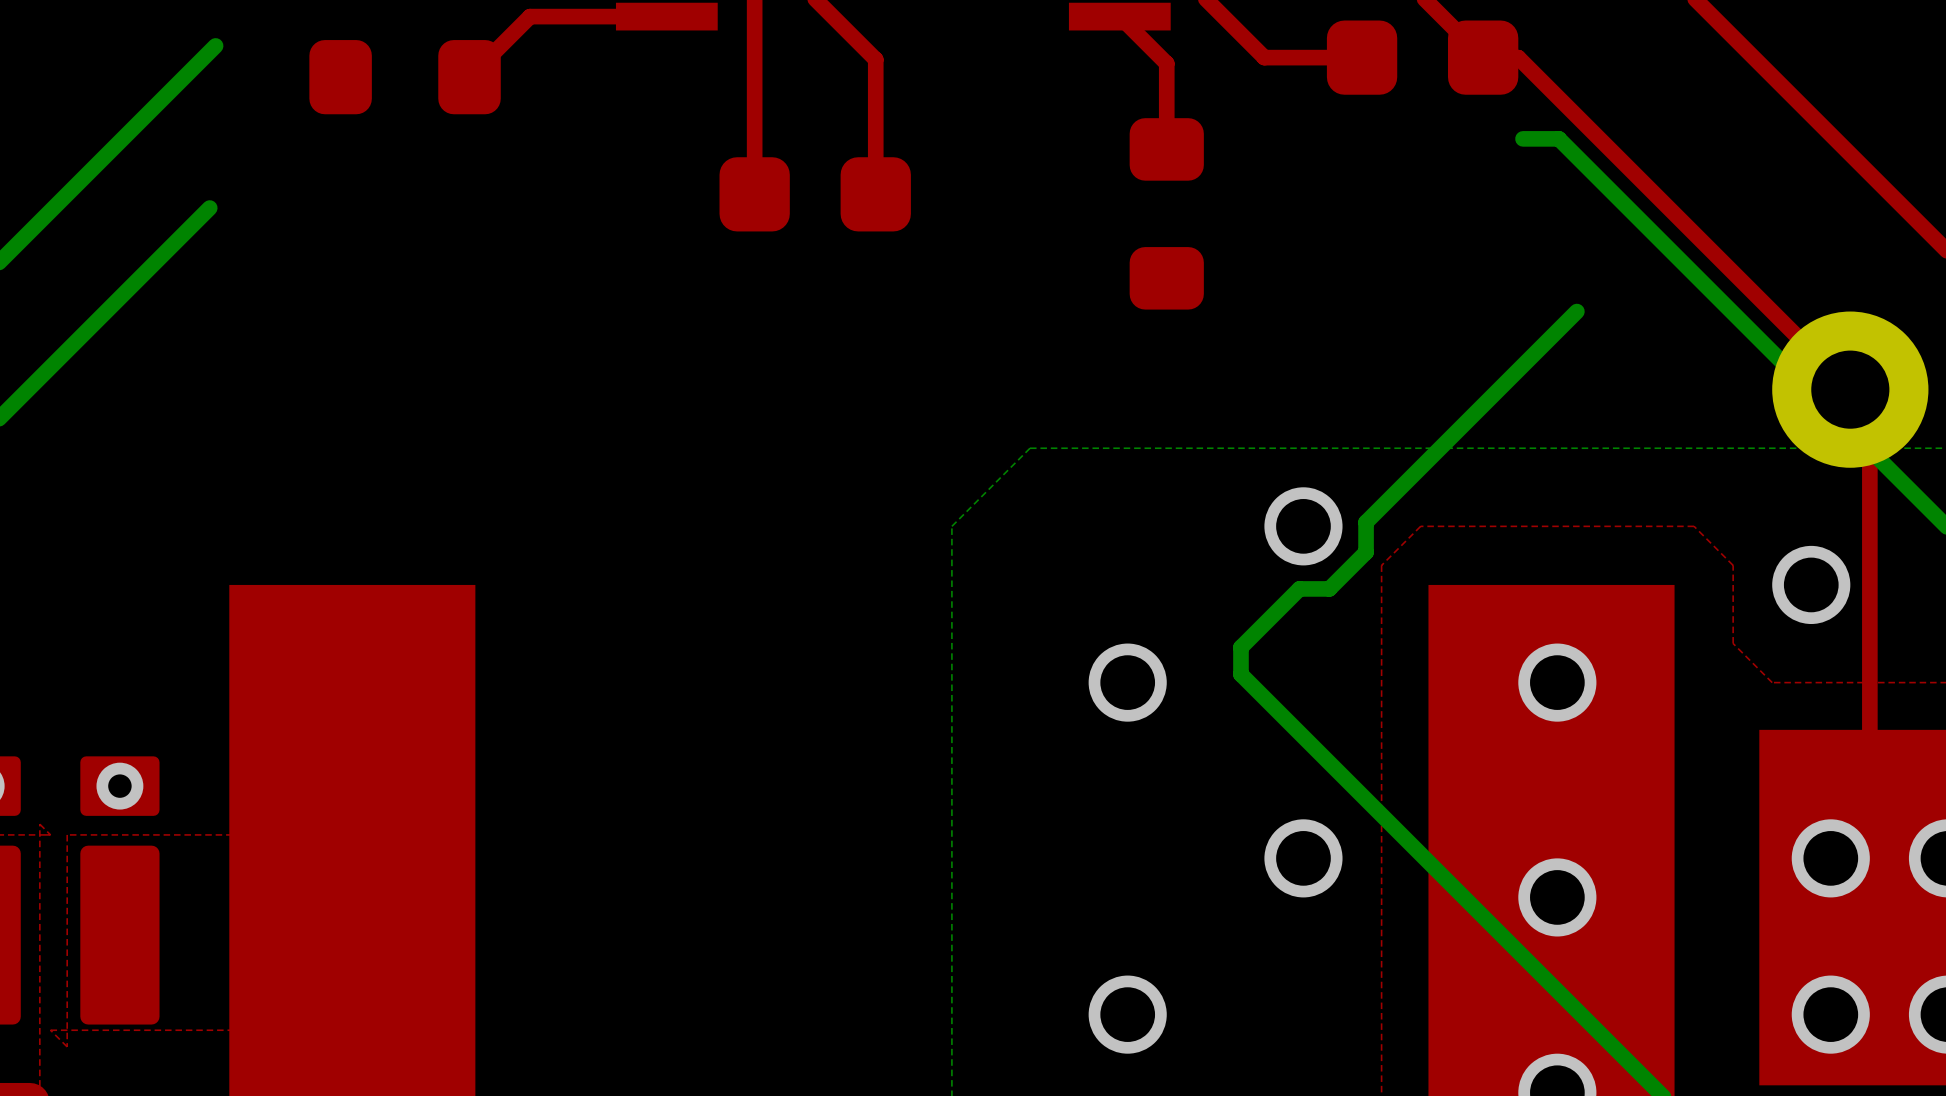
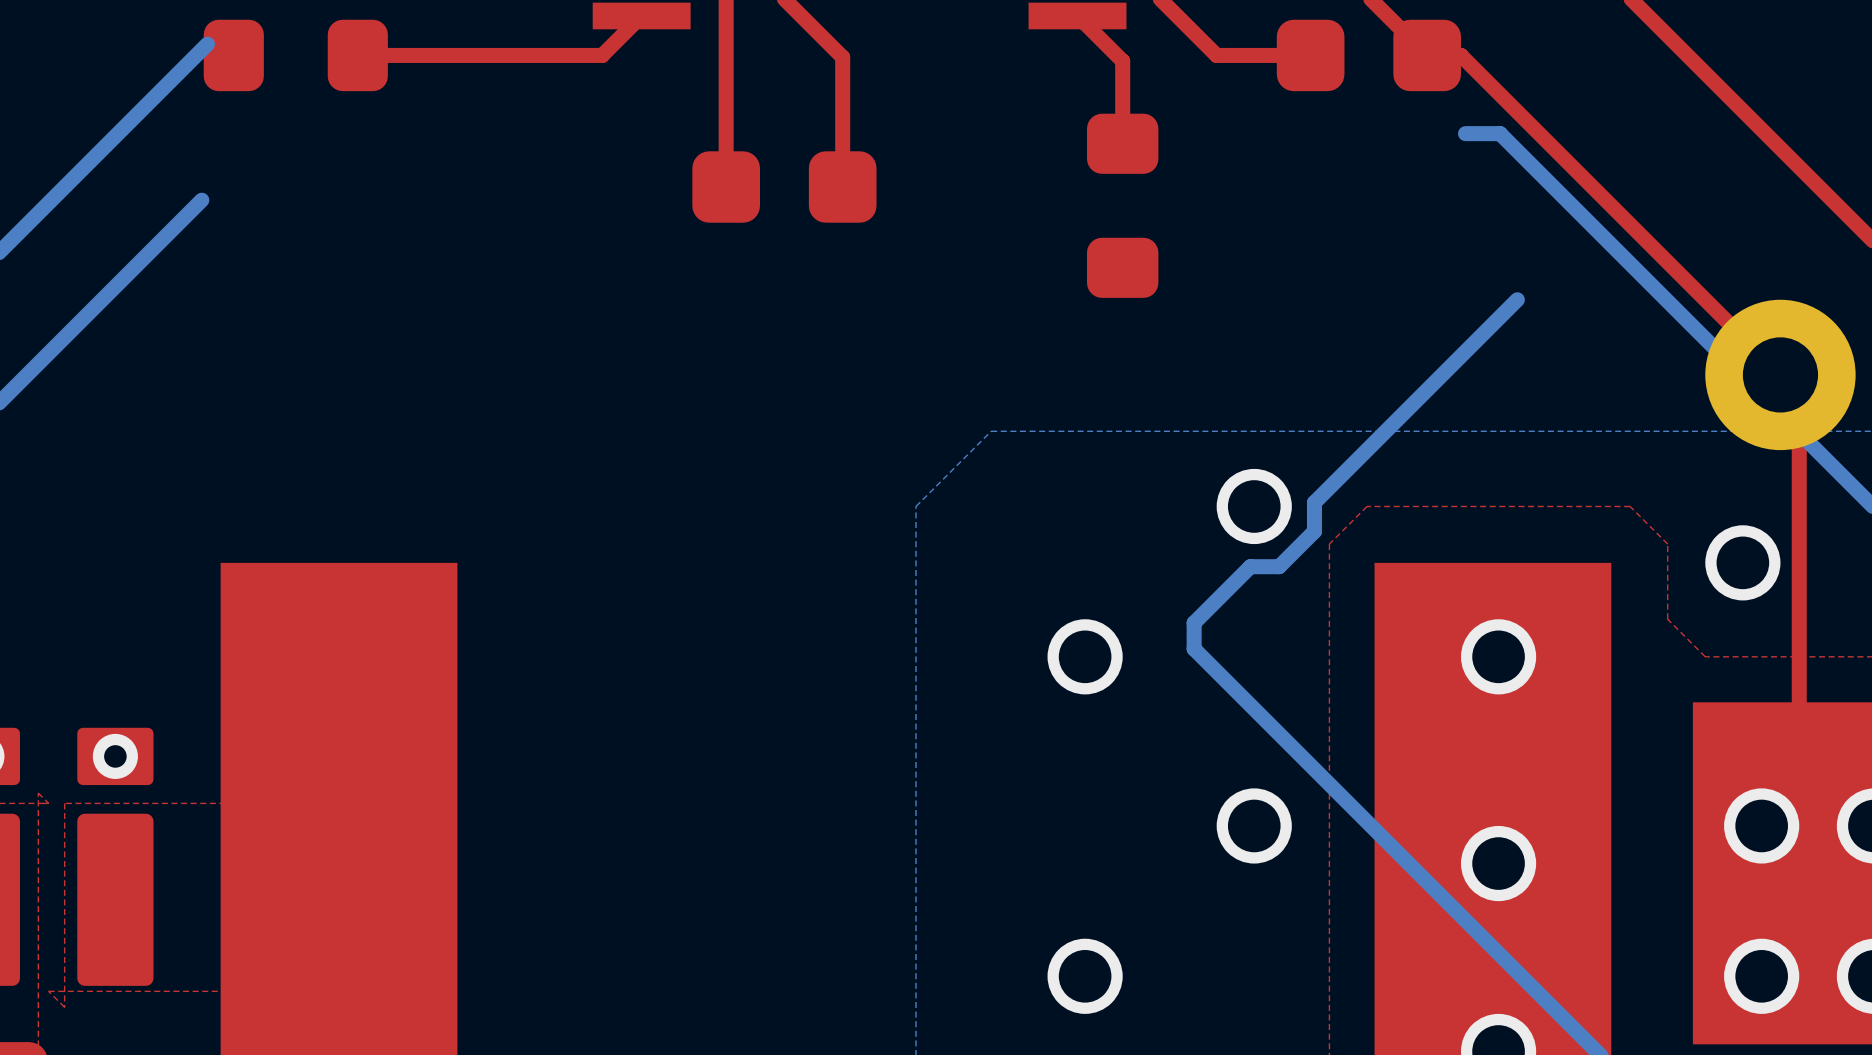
top track: (666, 16) (530, 16) (469, 77) -> (641, 15) (602, 55) (357, 55)
part: none -> (295, 55)
part: (405, 77) -> none

